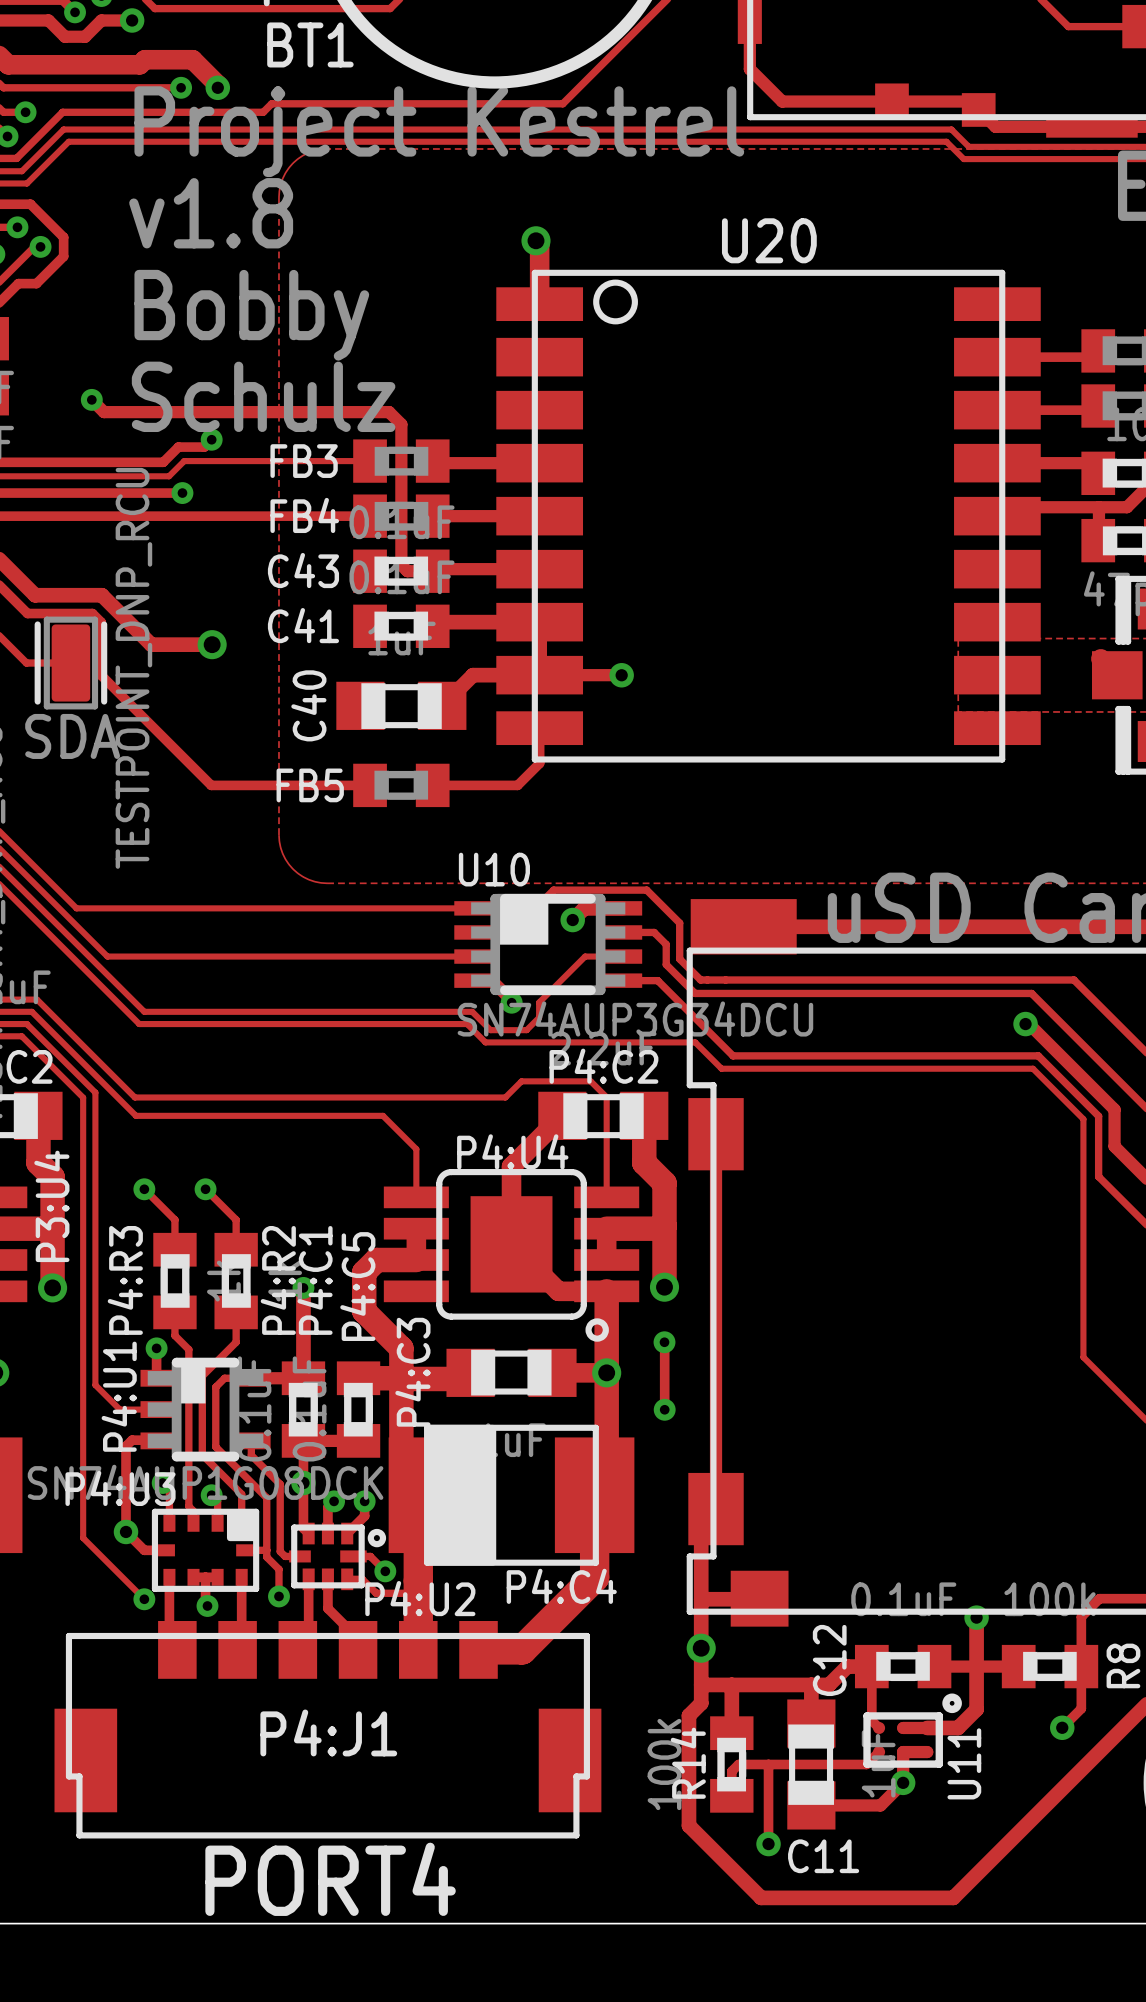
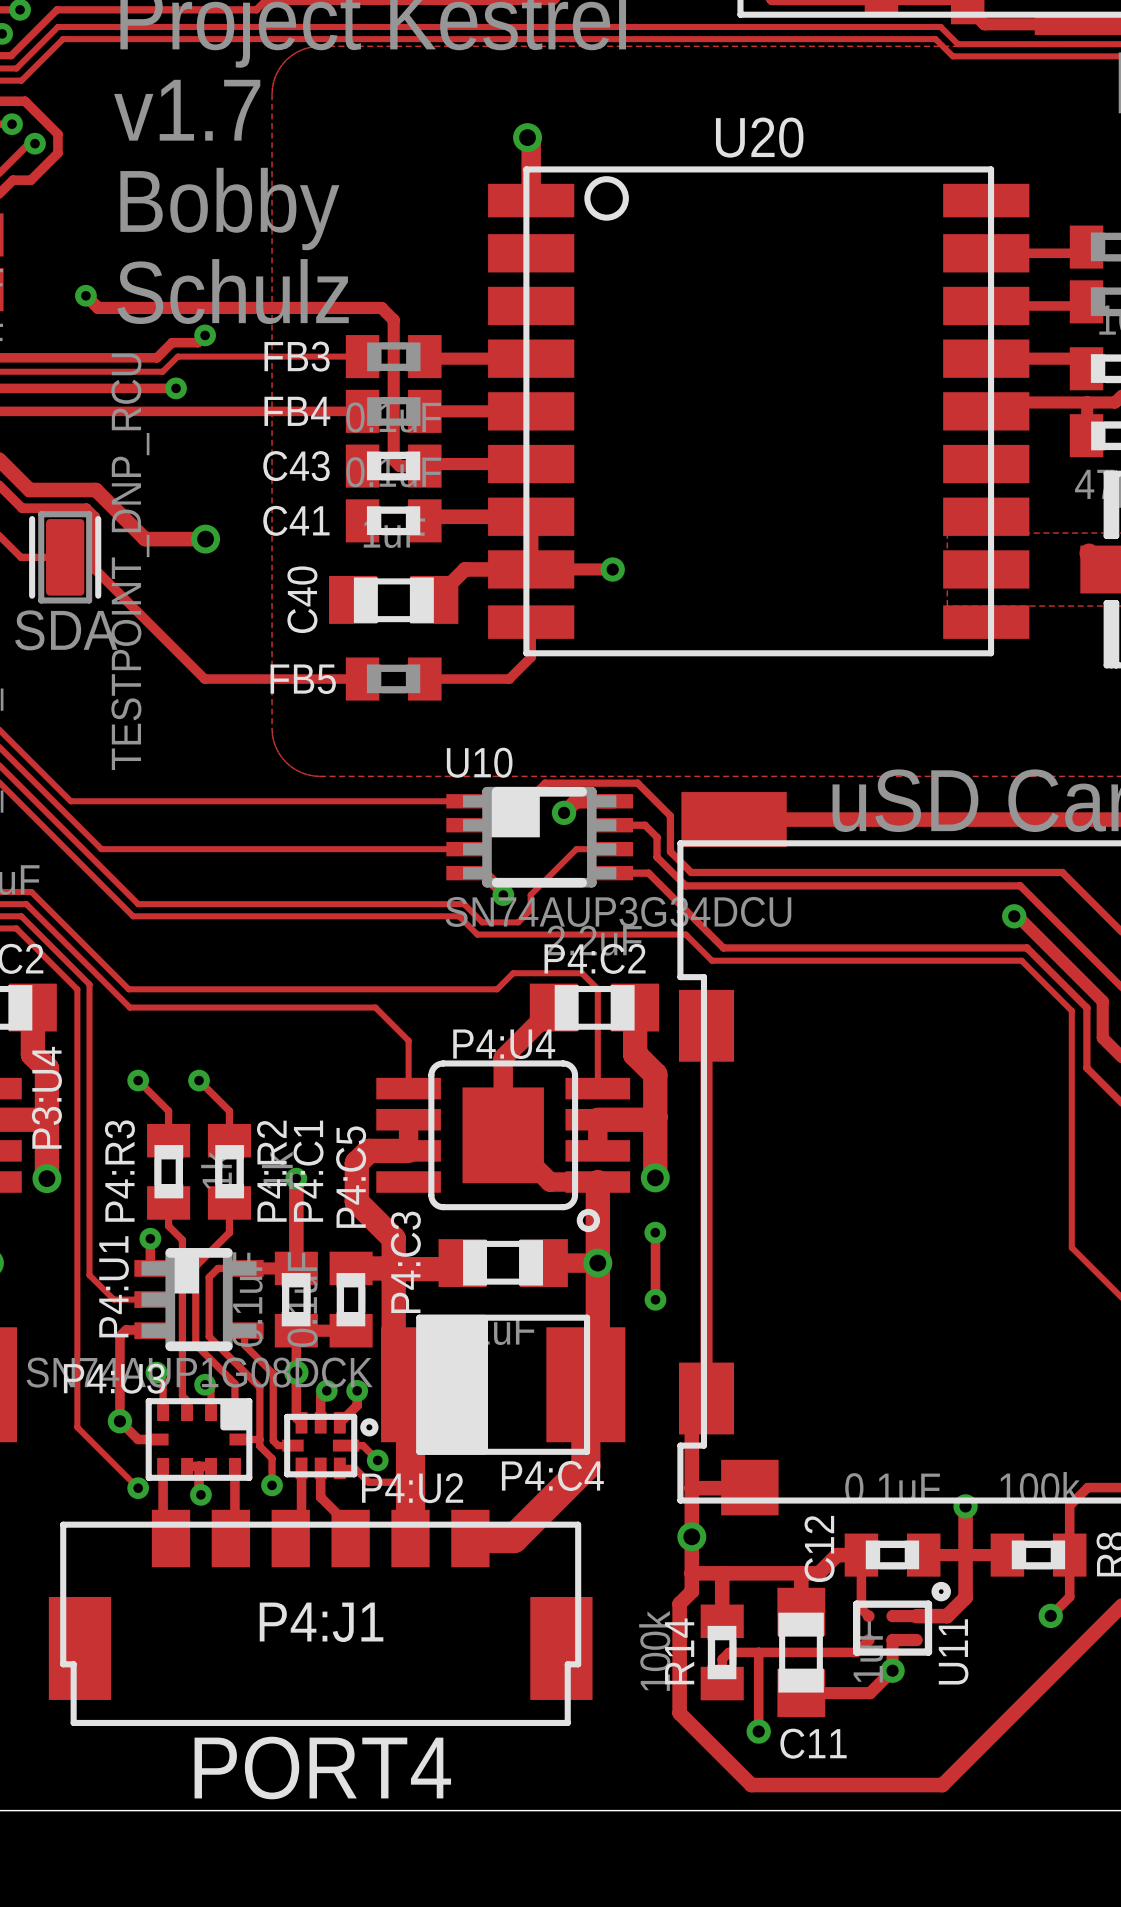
text: v1.8 (211, 213) -> v1.7 (187, 110)

